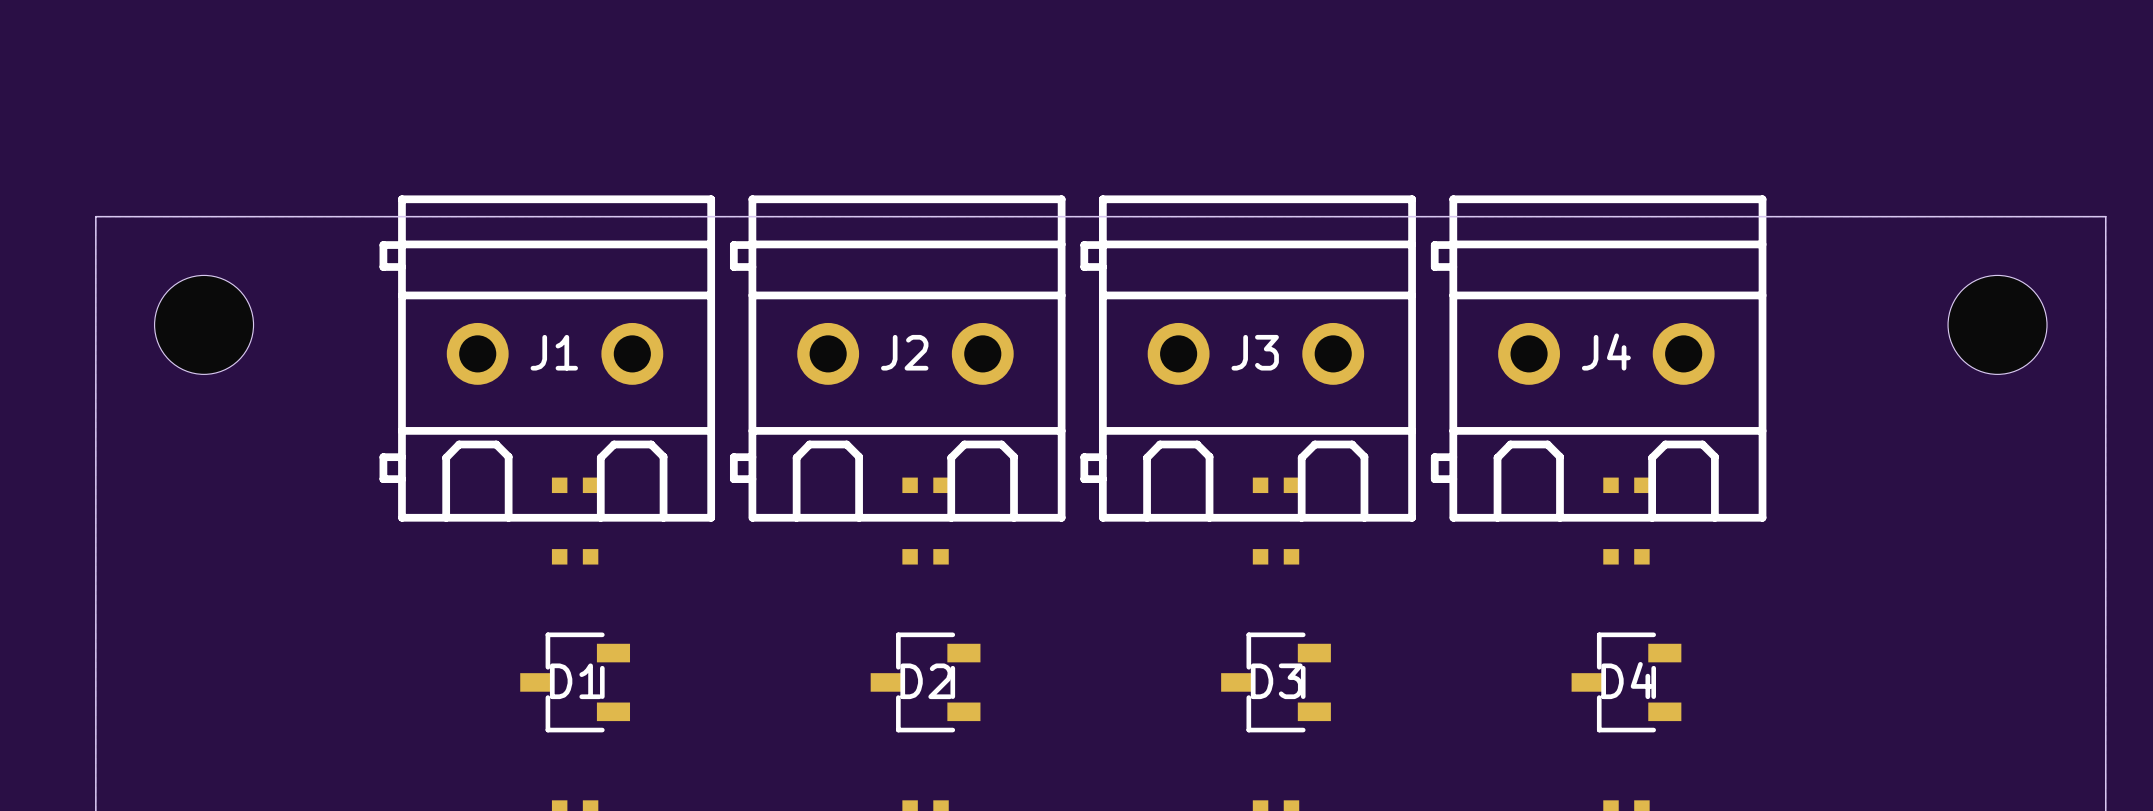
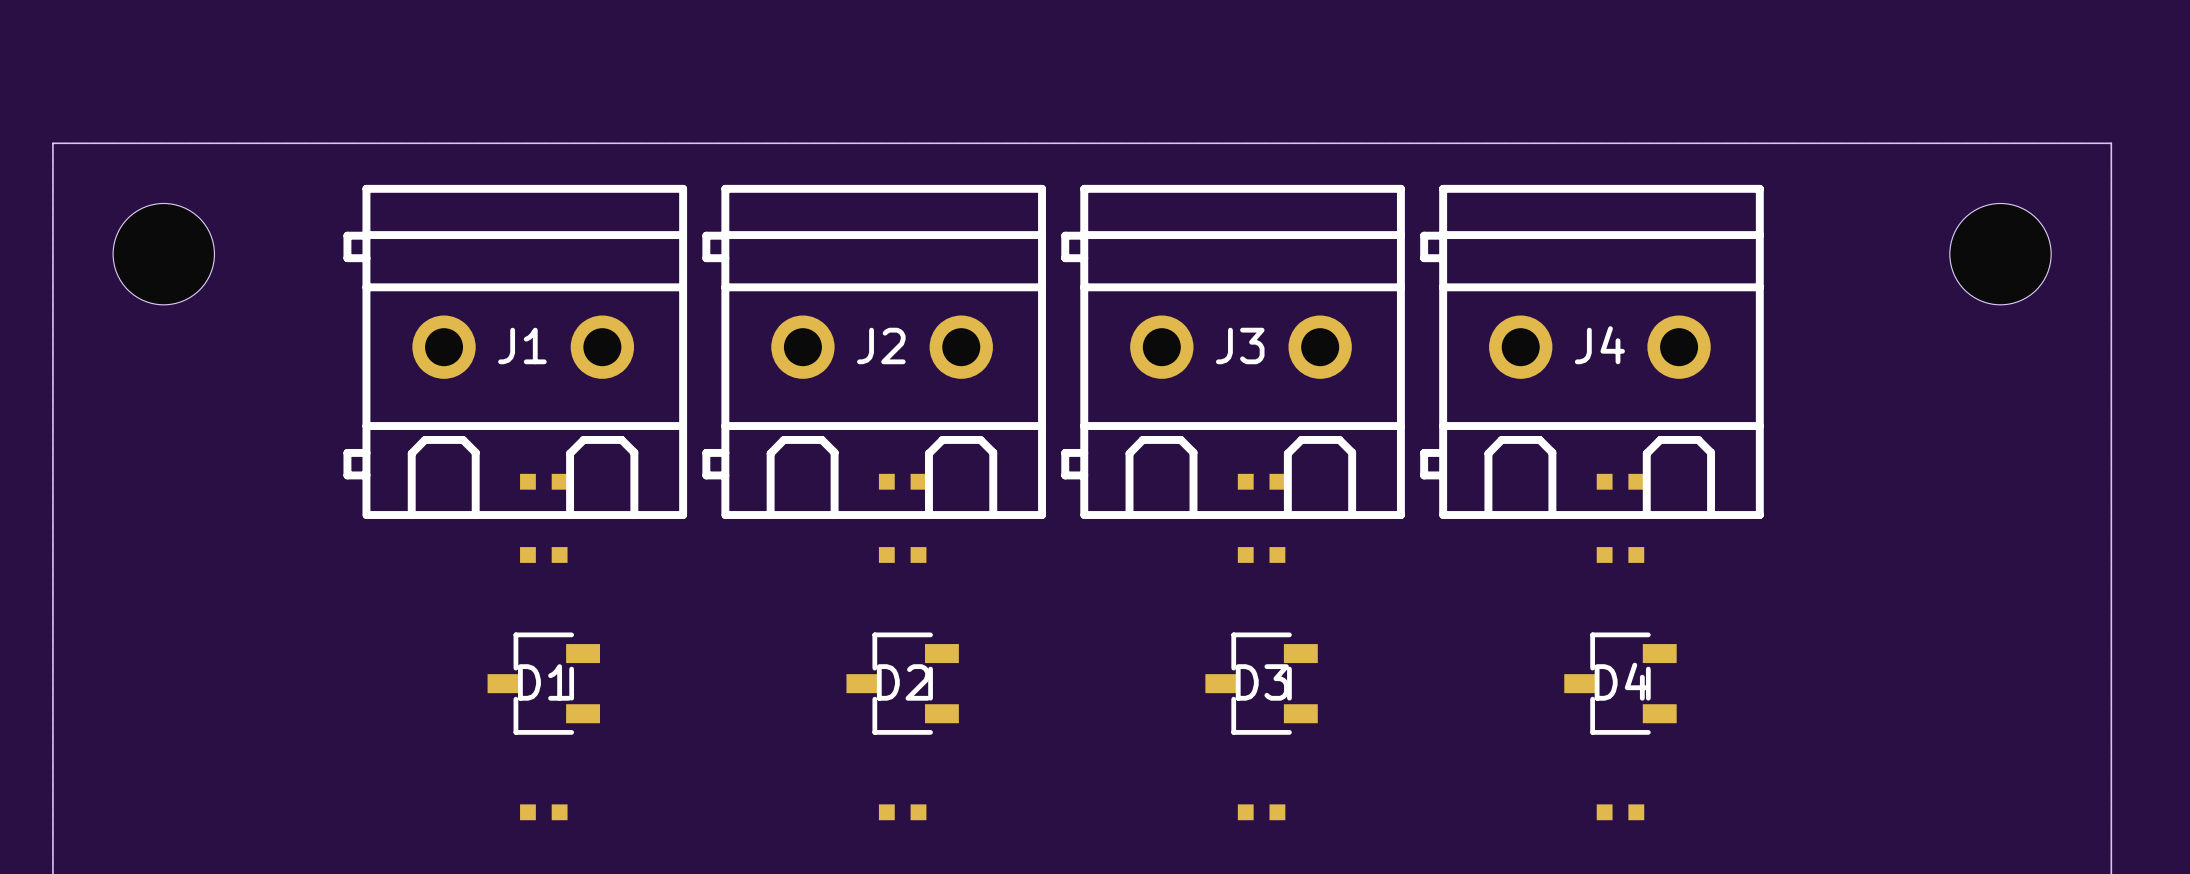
board edge: (95, 216) (2105, 216) -> (52, 206) (52, 143) (2111, 143) (2111, 206)
part position: (204, 324) -> (163, 254)
part position: (1997, 324) -> (2000, 254)

